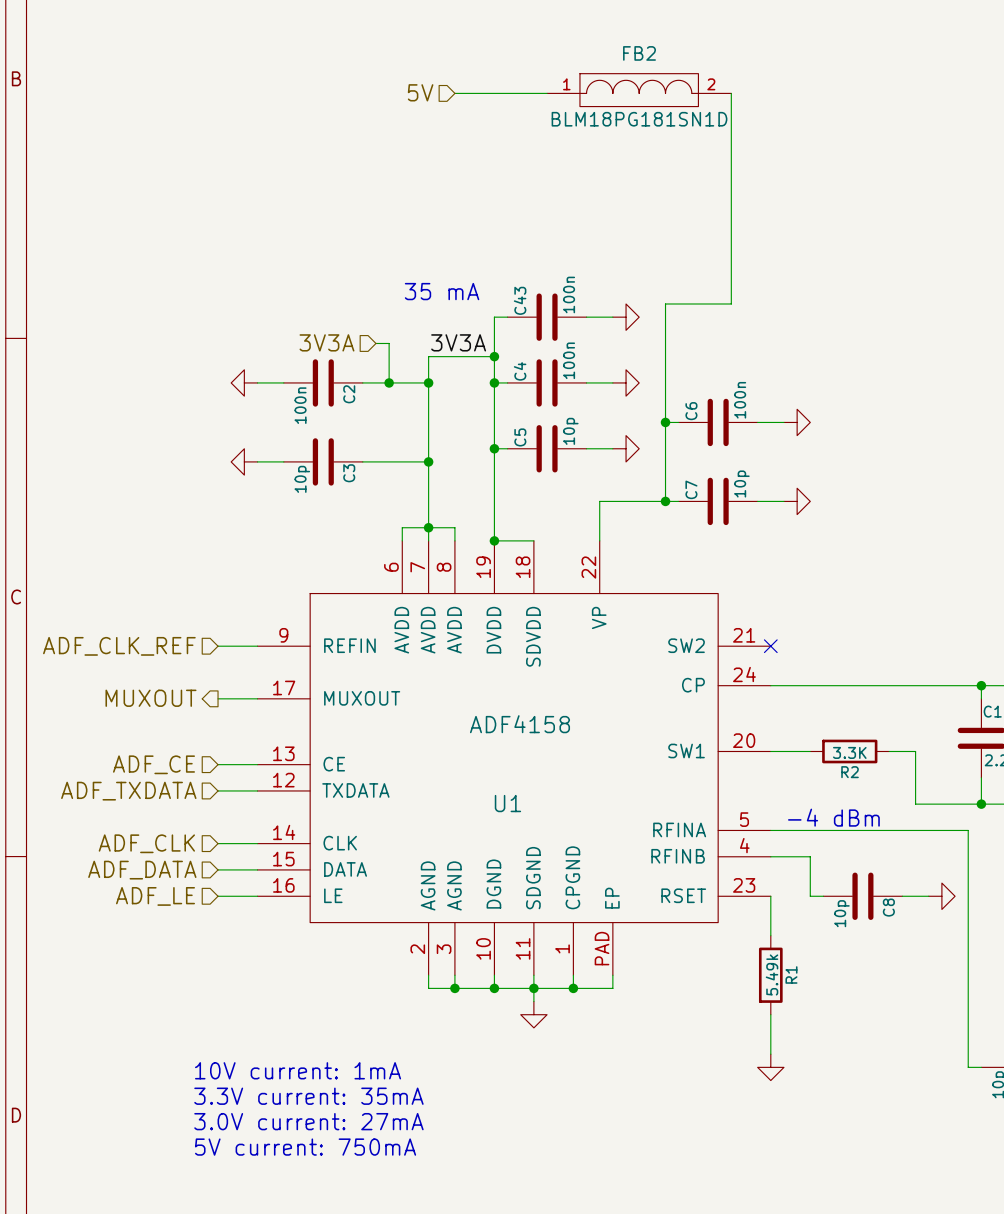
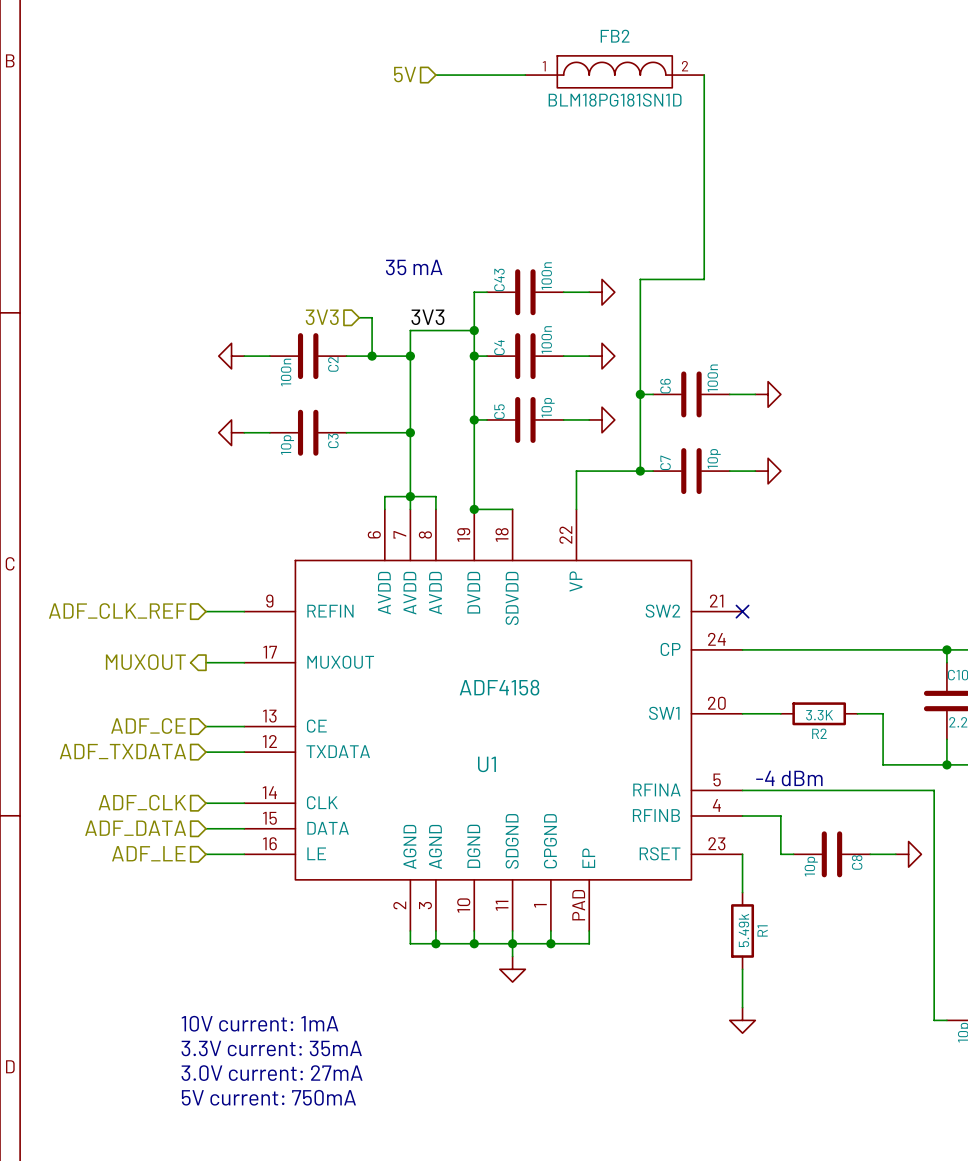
hierarchical label: 3V3A (326, 342) -> 3V3 (322, 317)
label: 3V3A (458, 342) -> 3V3 (427, 317)

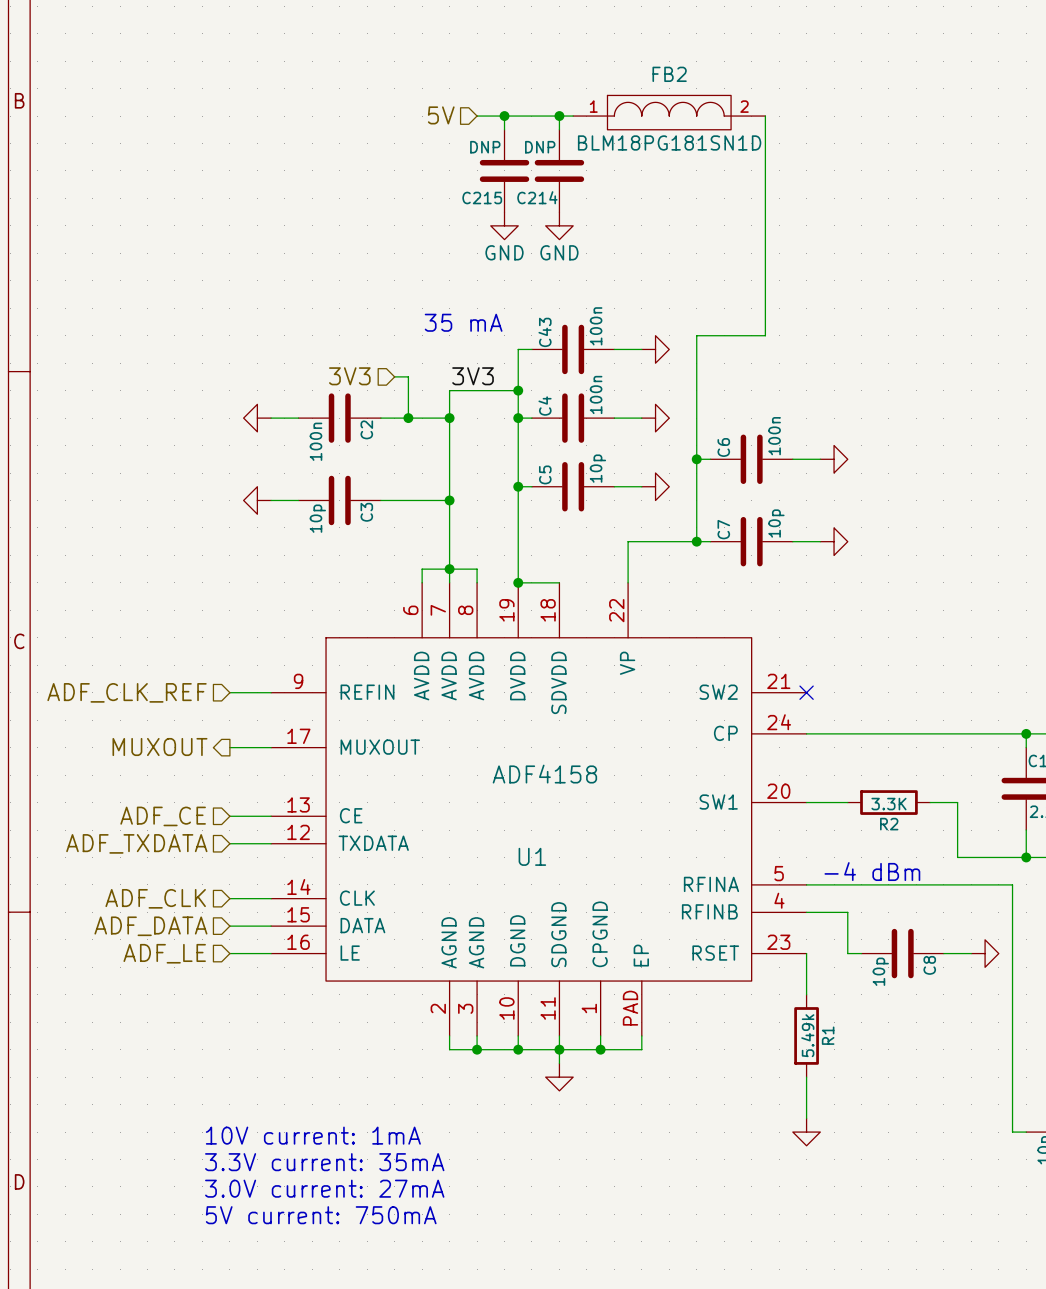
wire: none -> (504, 116) (504, 129)
junction: none -> (504, 116)
wire: none -> (559, 116) (559, 129)
junction: none -> (559, 116)
C215: none -> DNP (504, 170)
C214: none -> DNP (559, 170)
power symbol: none -> GND (504, 225)
power symbol: none -> GND (559, 225)

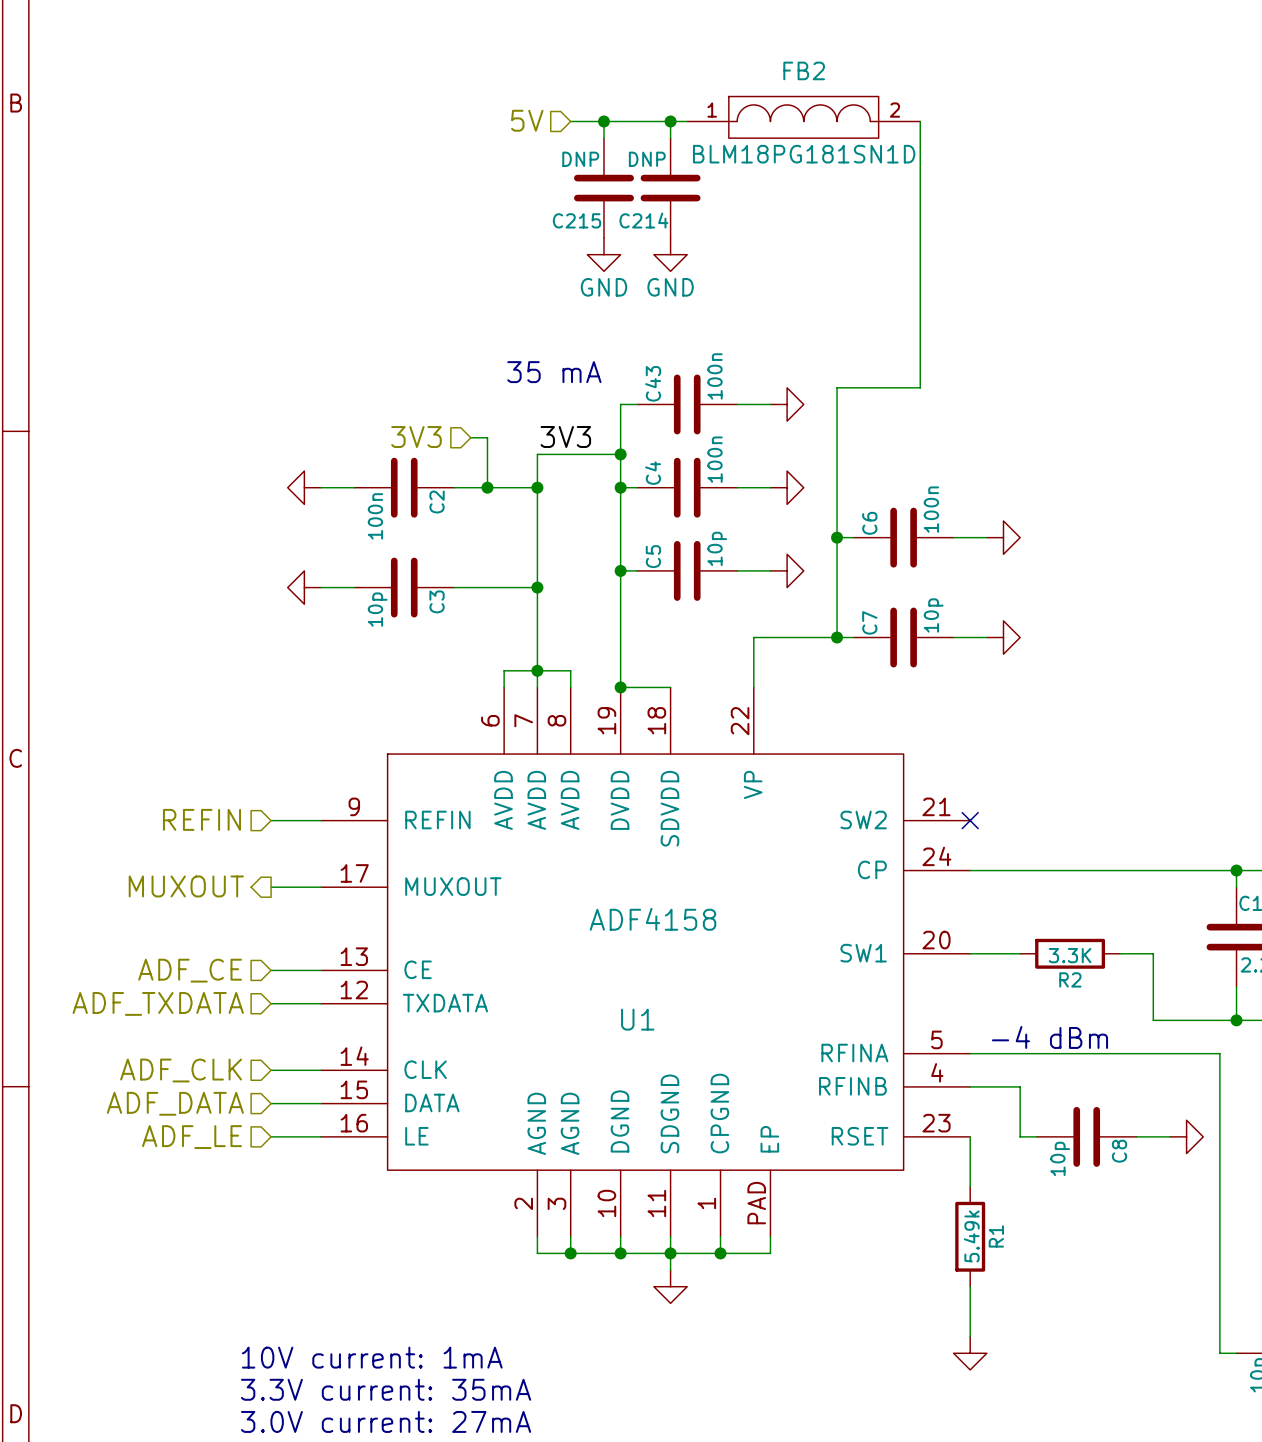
hierarchical label: ADF_CLK_REF (127, 692) -> REFIN (201, 819)

